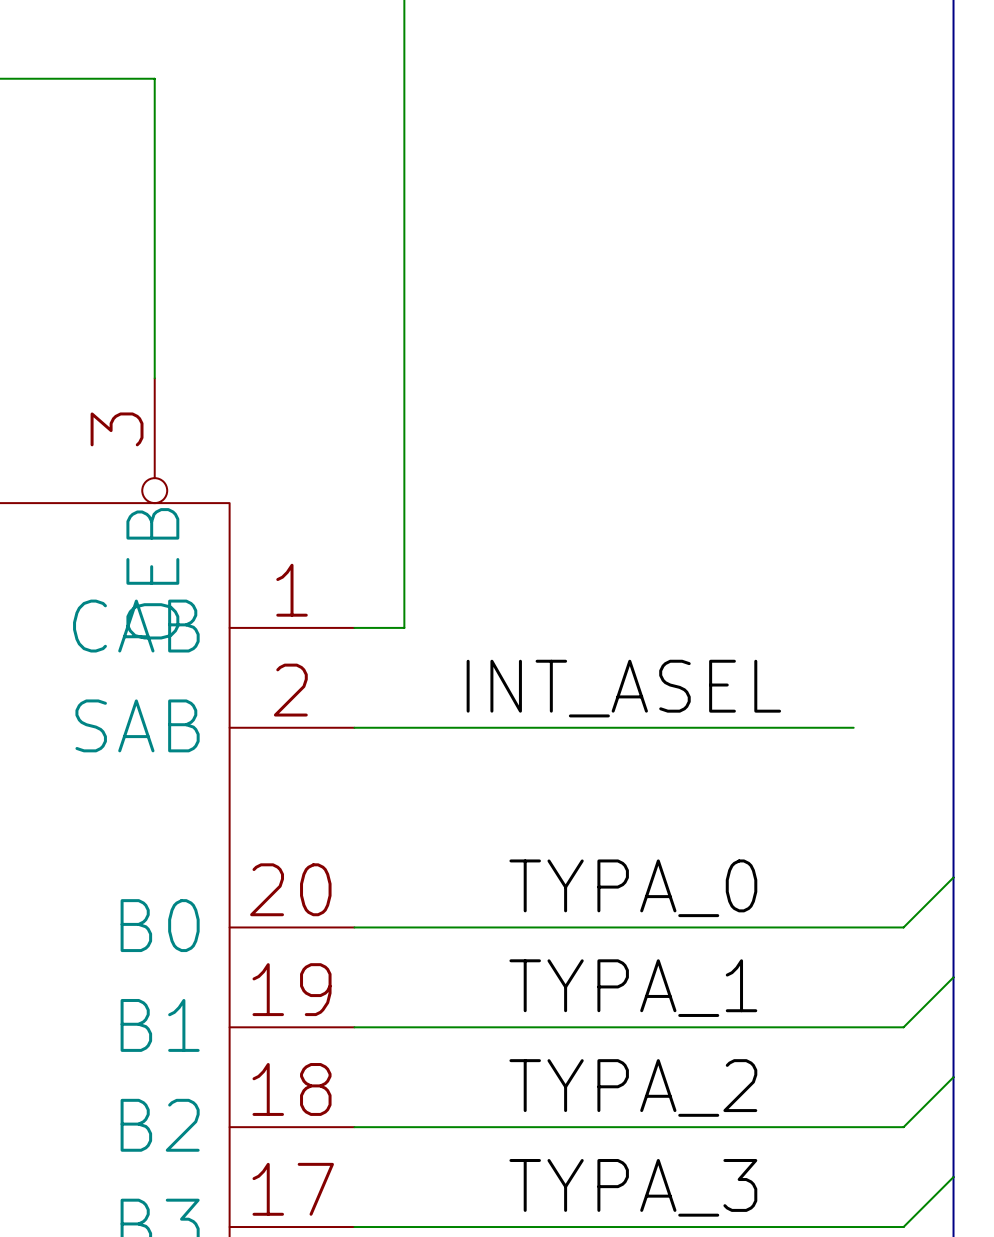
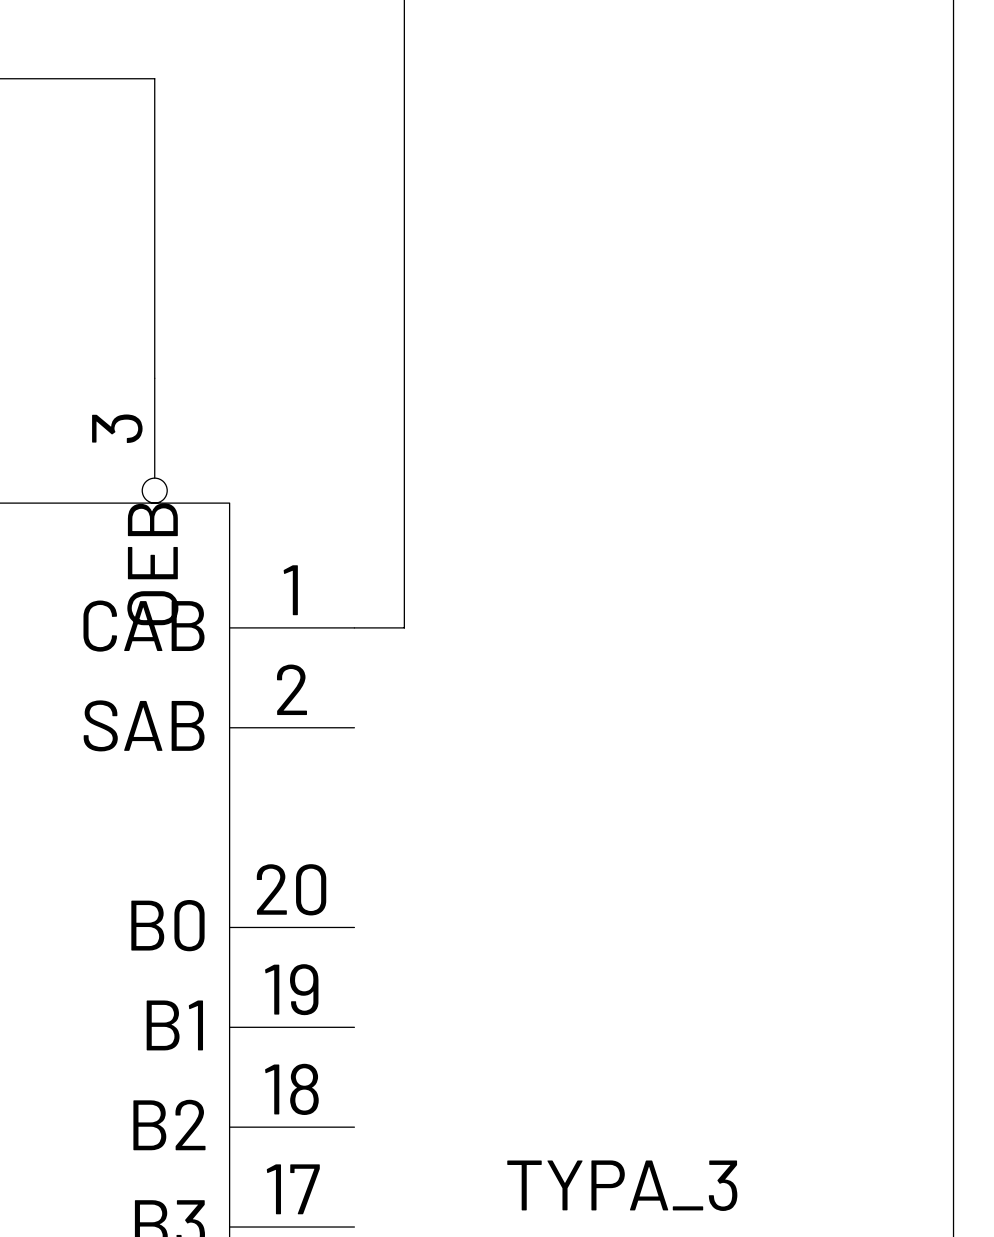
label: INT_ASEL (623, 688) -> none
wire: (354, 727) (853, 727) -> none
wire: (953, 877) (903, 927) (354, 927) -> none
label: TYPA_0 (633, 888) -> none
wire: (953, 977) (903, 1027) (354, 1027) -> none
label: TYPA_1 (633, 988) -> none
wire: (953, 1077) (903, 1127) (354, 1127) -> none
label: TYPA_2 (633, 1087) -> none
wire: (953, 1177) (903, 1227) (354, 1227) -> none

